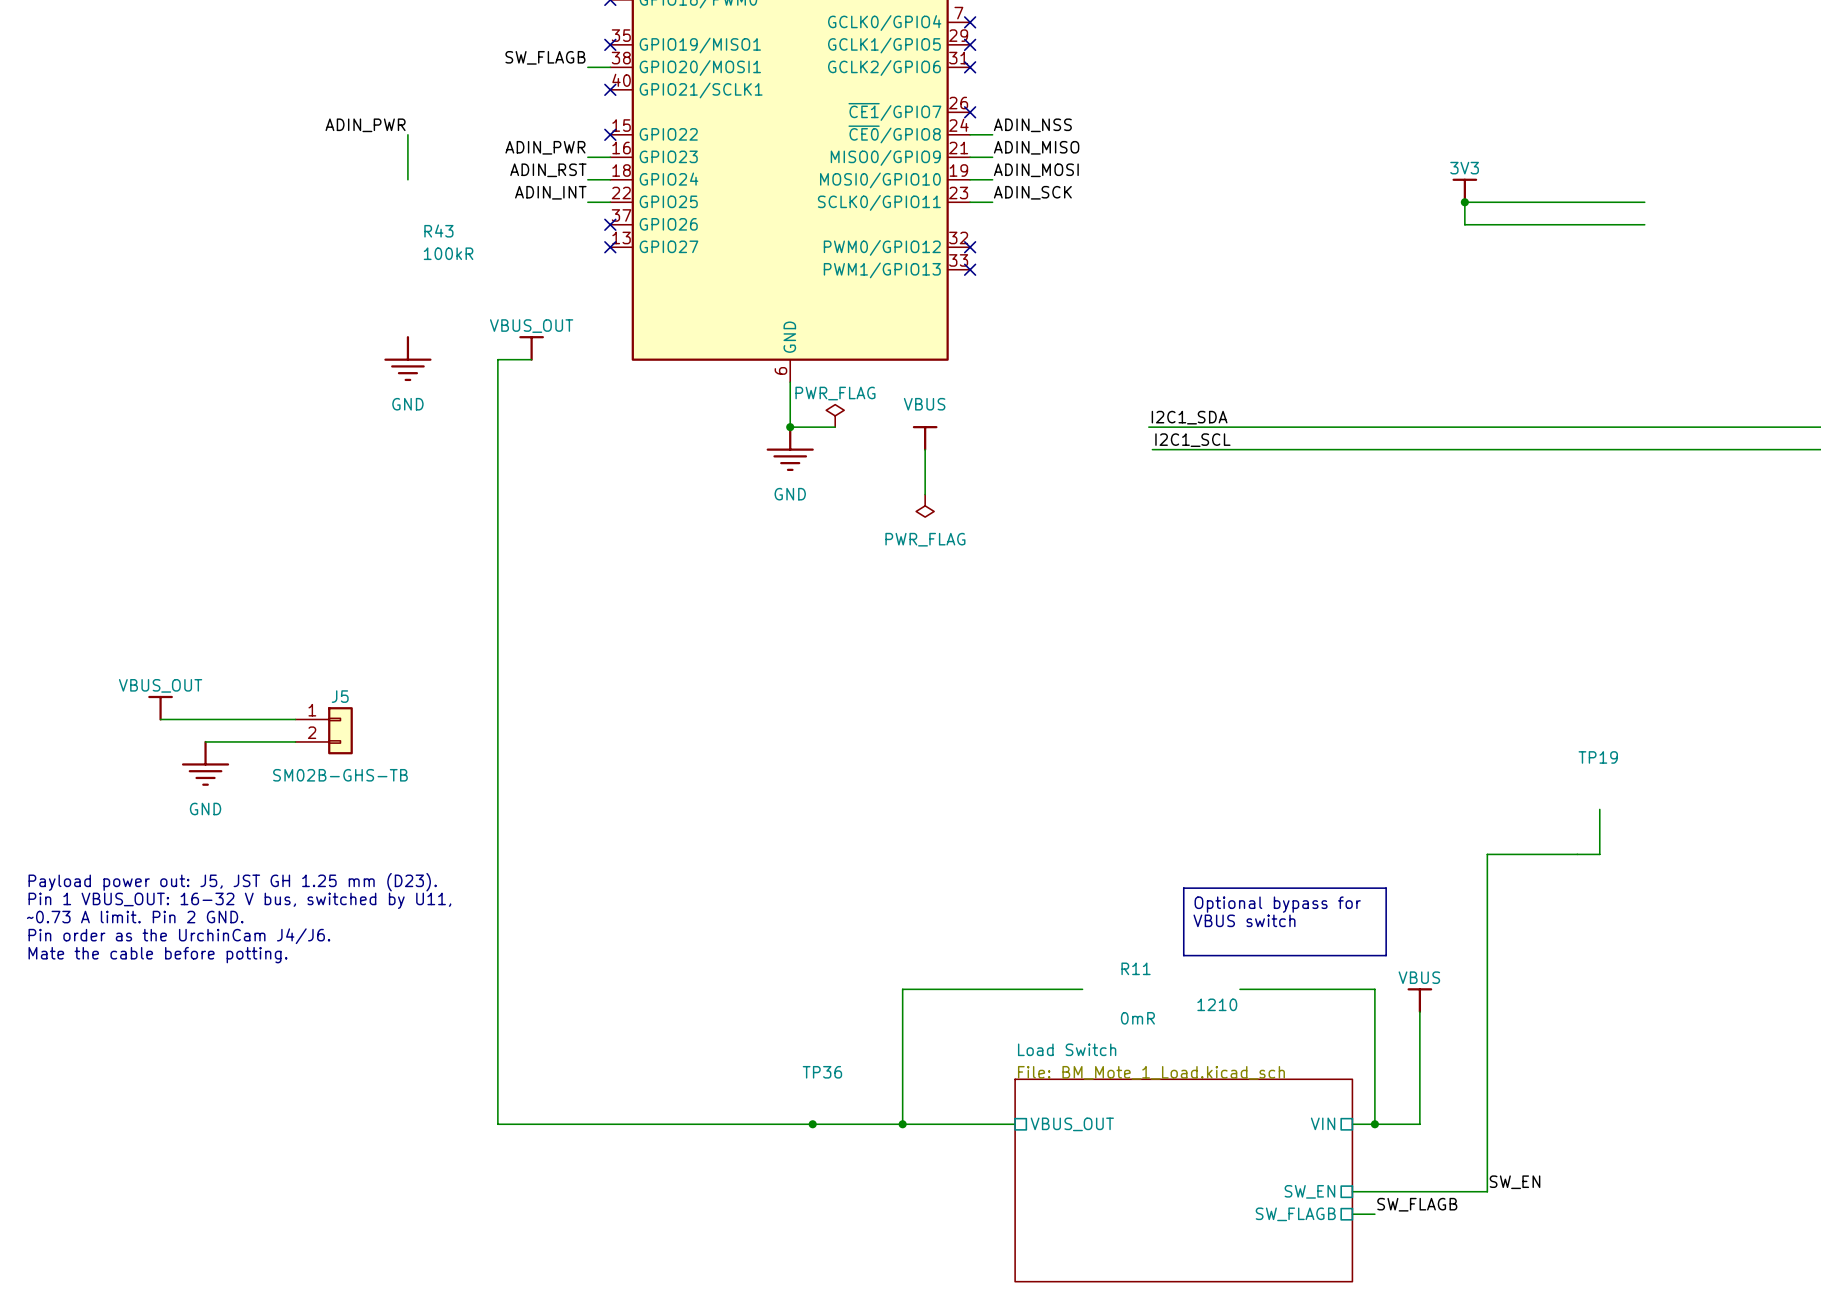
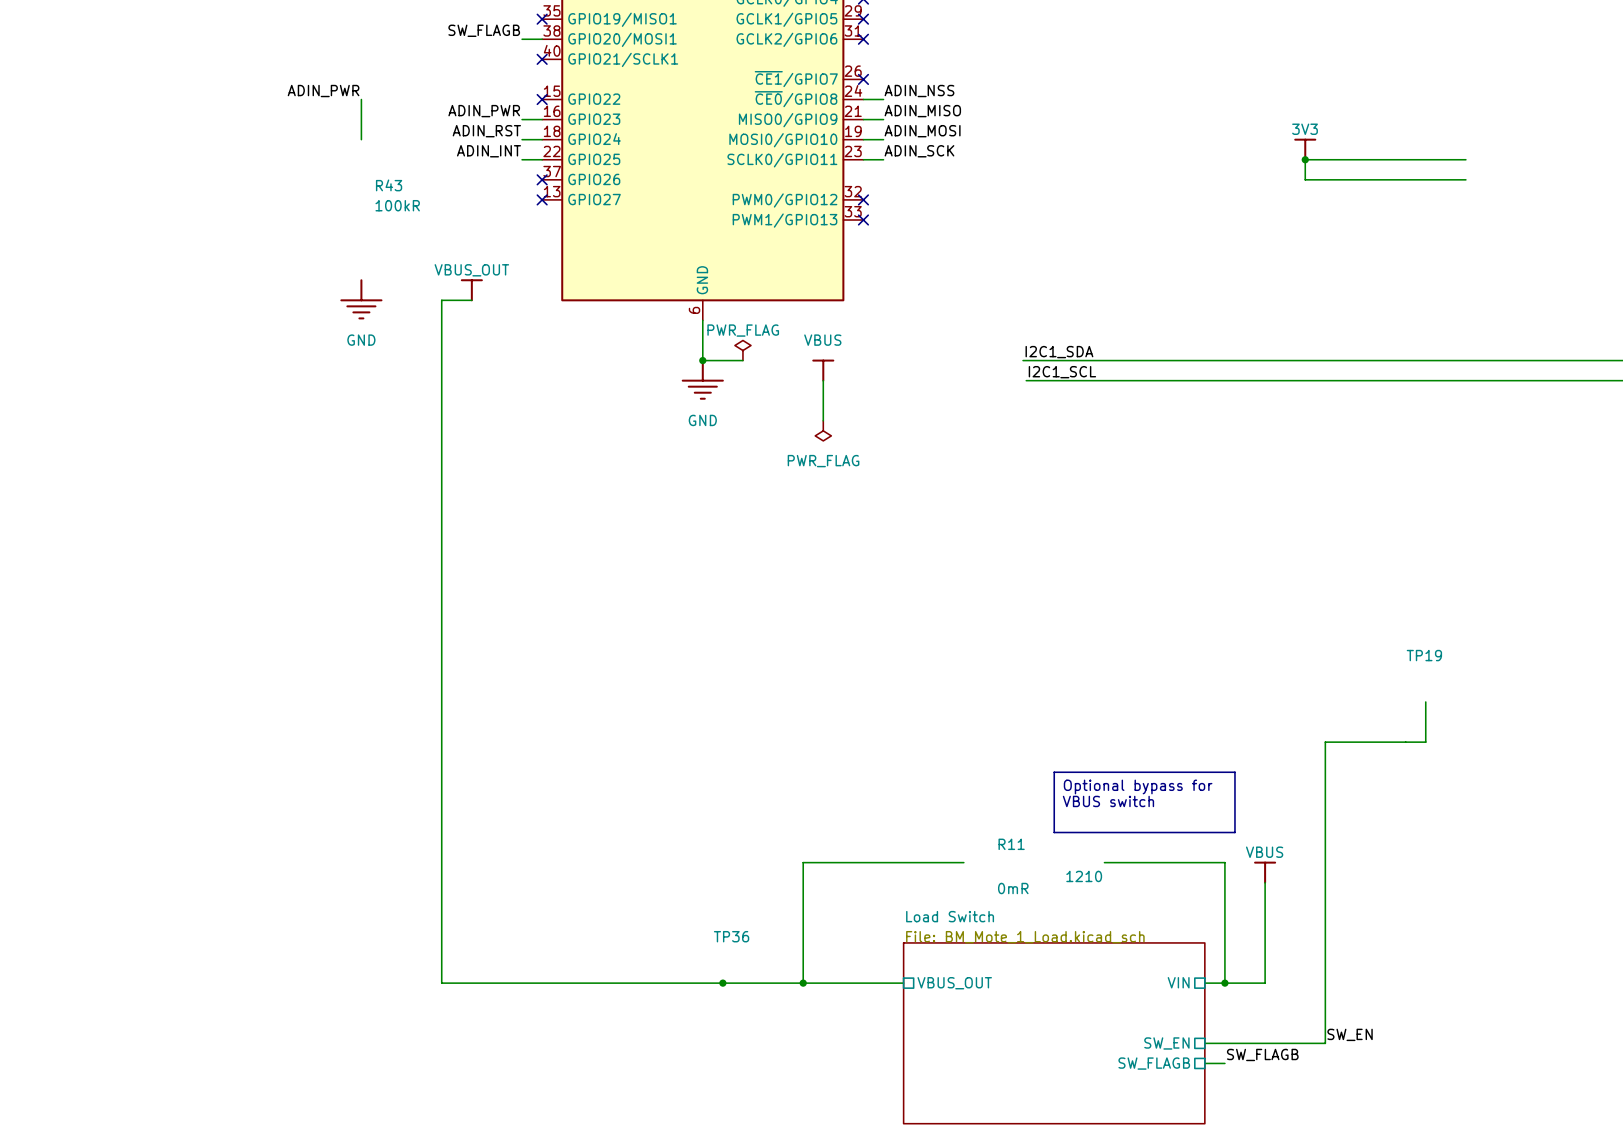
power symbol: VBUS_OUT (160, 708) -> none
wire: (160, 719) (295, 719) -> none
J5: SM02B-GHS-TB (324, 730) -> none
wire: (205, 741) (295, 741) -> none
power symbol: GND (205, 763) -> none
text: Payload power out: J5, JST GH 1.25 mm (D23). (232, 882) -> none
text: Pin 1 VBUS_OUT: 16-32 V bus, switched by U11, (239, 900) -> none
text: ~0.73 A limit. Pin 2 GND. (135, 917) -> none
text: Pin order as the UrchinCam J4/J6. (179, 936) -> none
text: Mate the cable before potting. (157, 955) -> none

